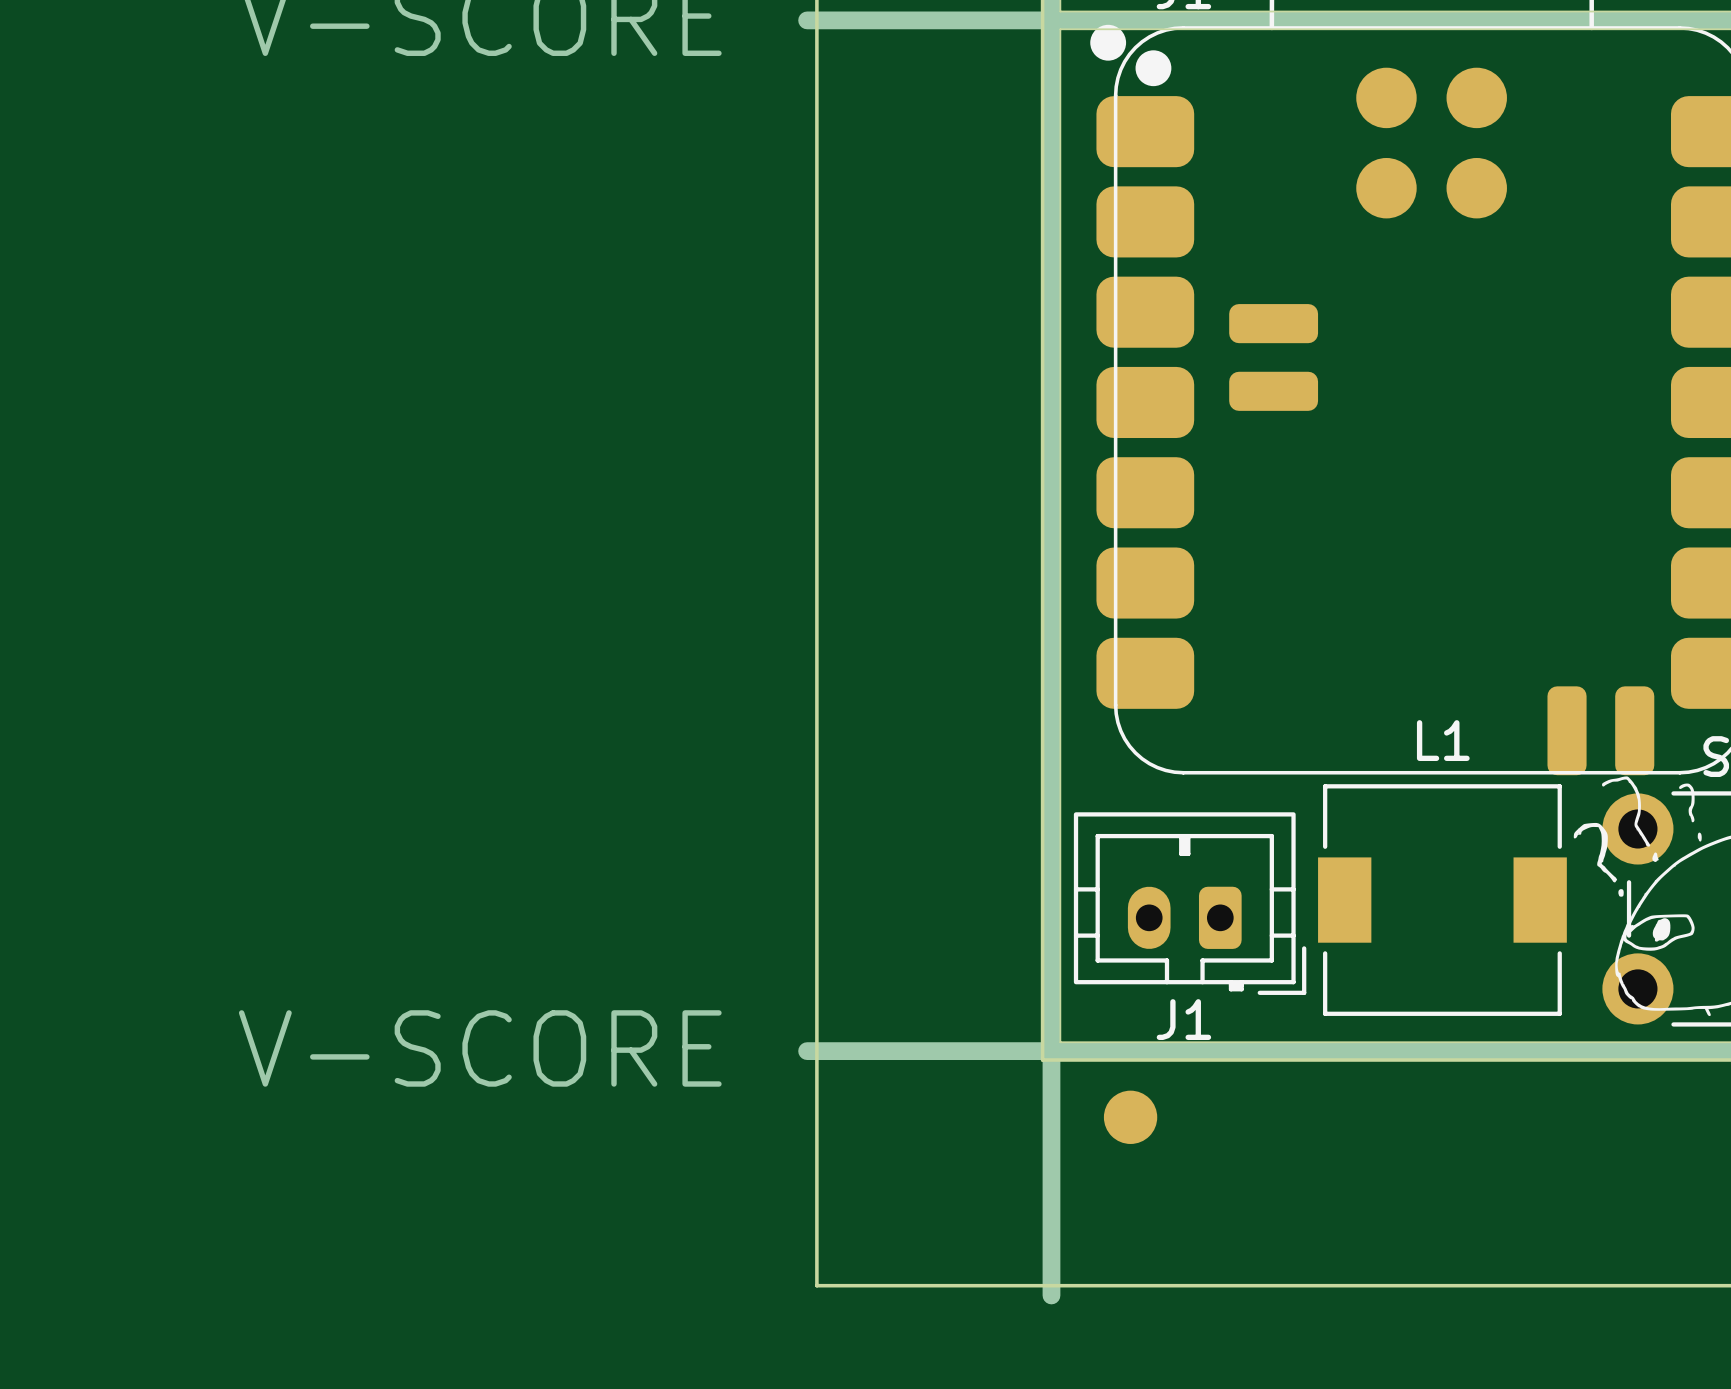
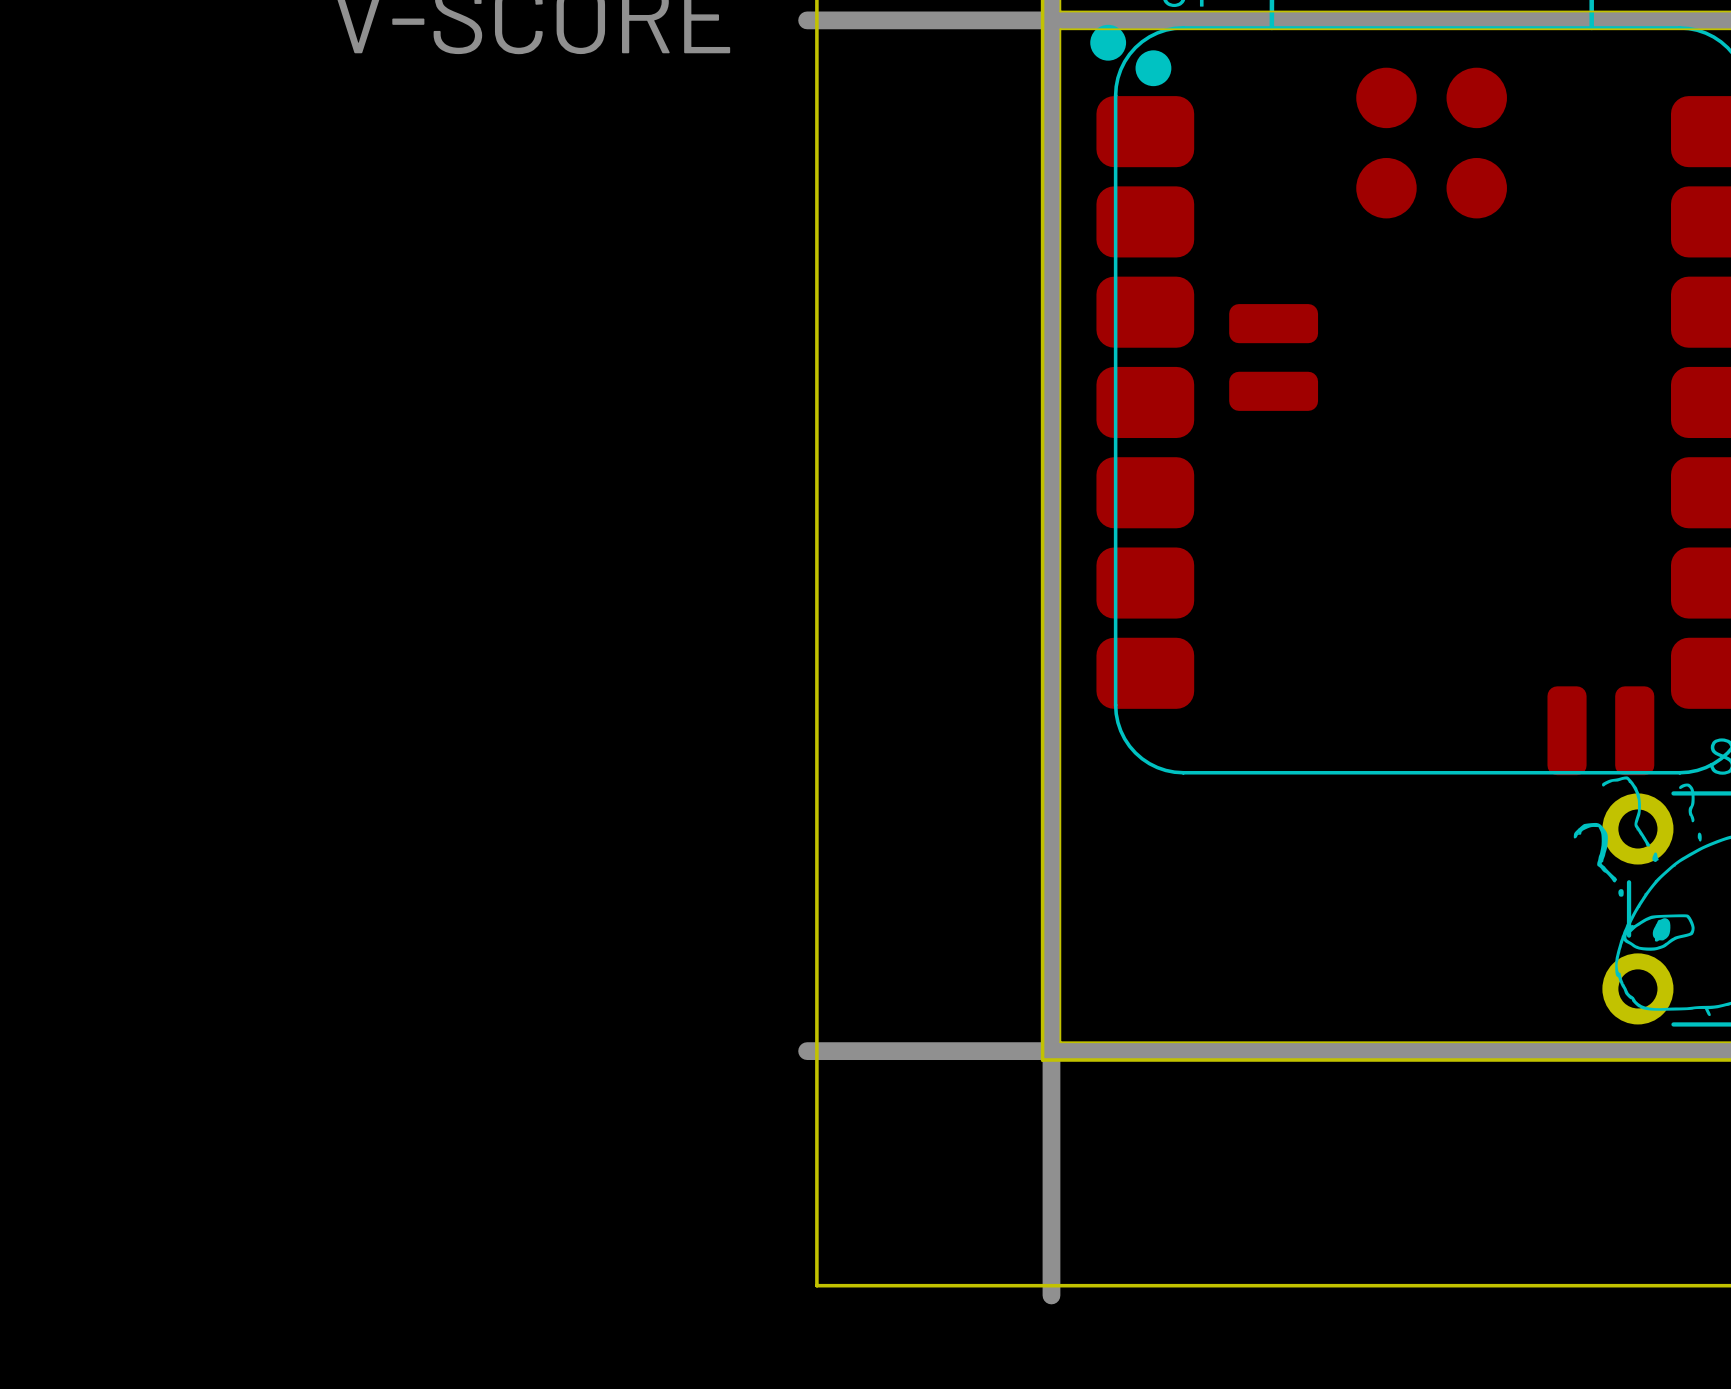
L1: (1442, 900) -> none
J1: (1190, 903) -> none
text: V-SCORE (480, 1048) -> none
part: (1130, 1117) -> none

